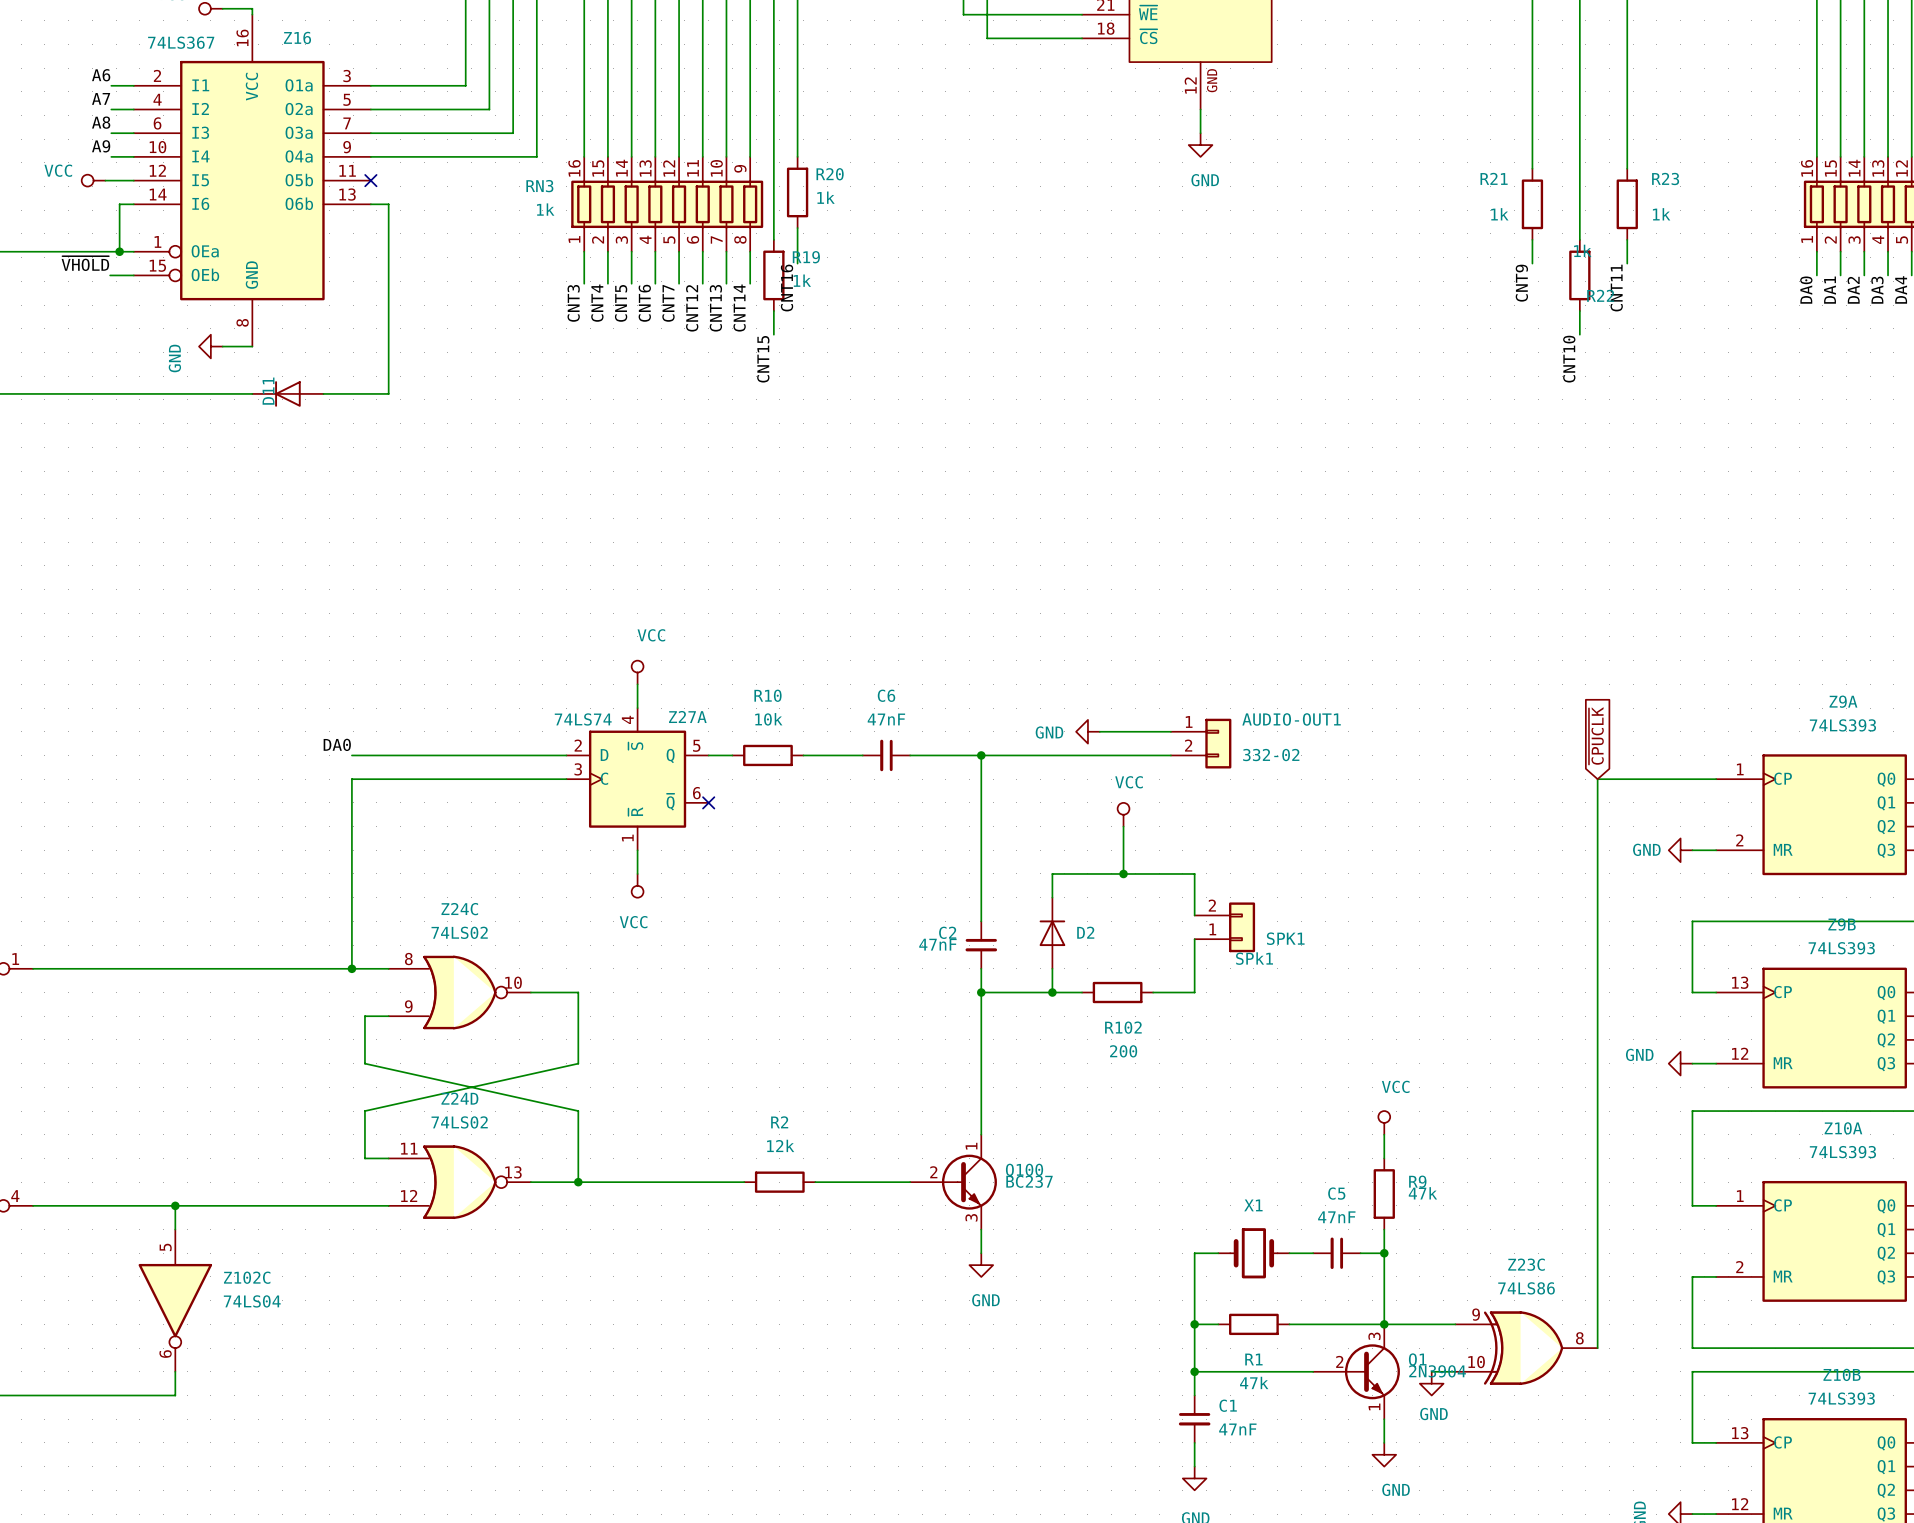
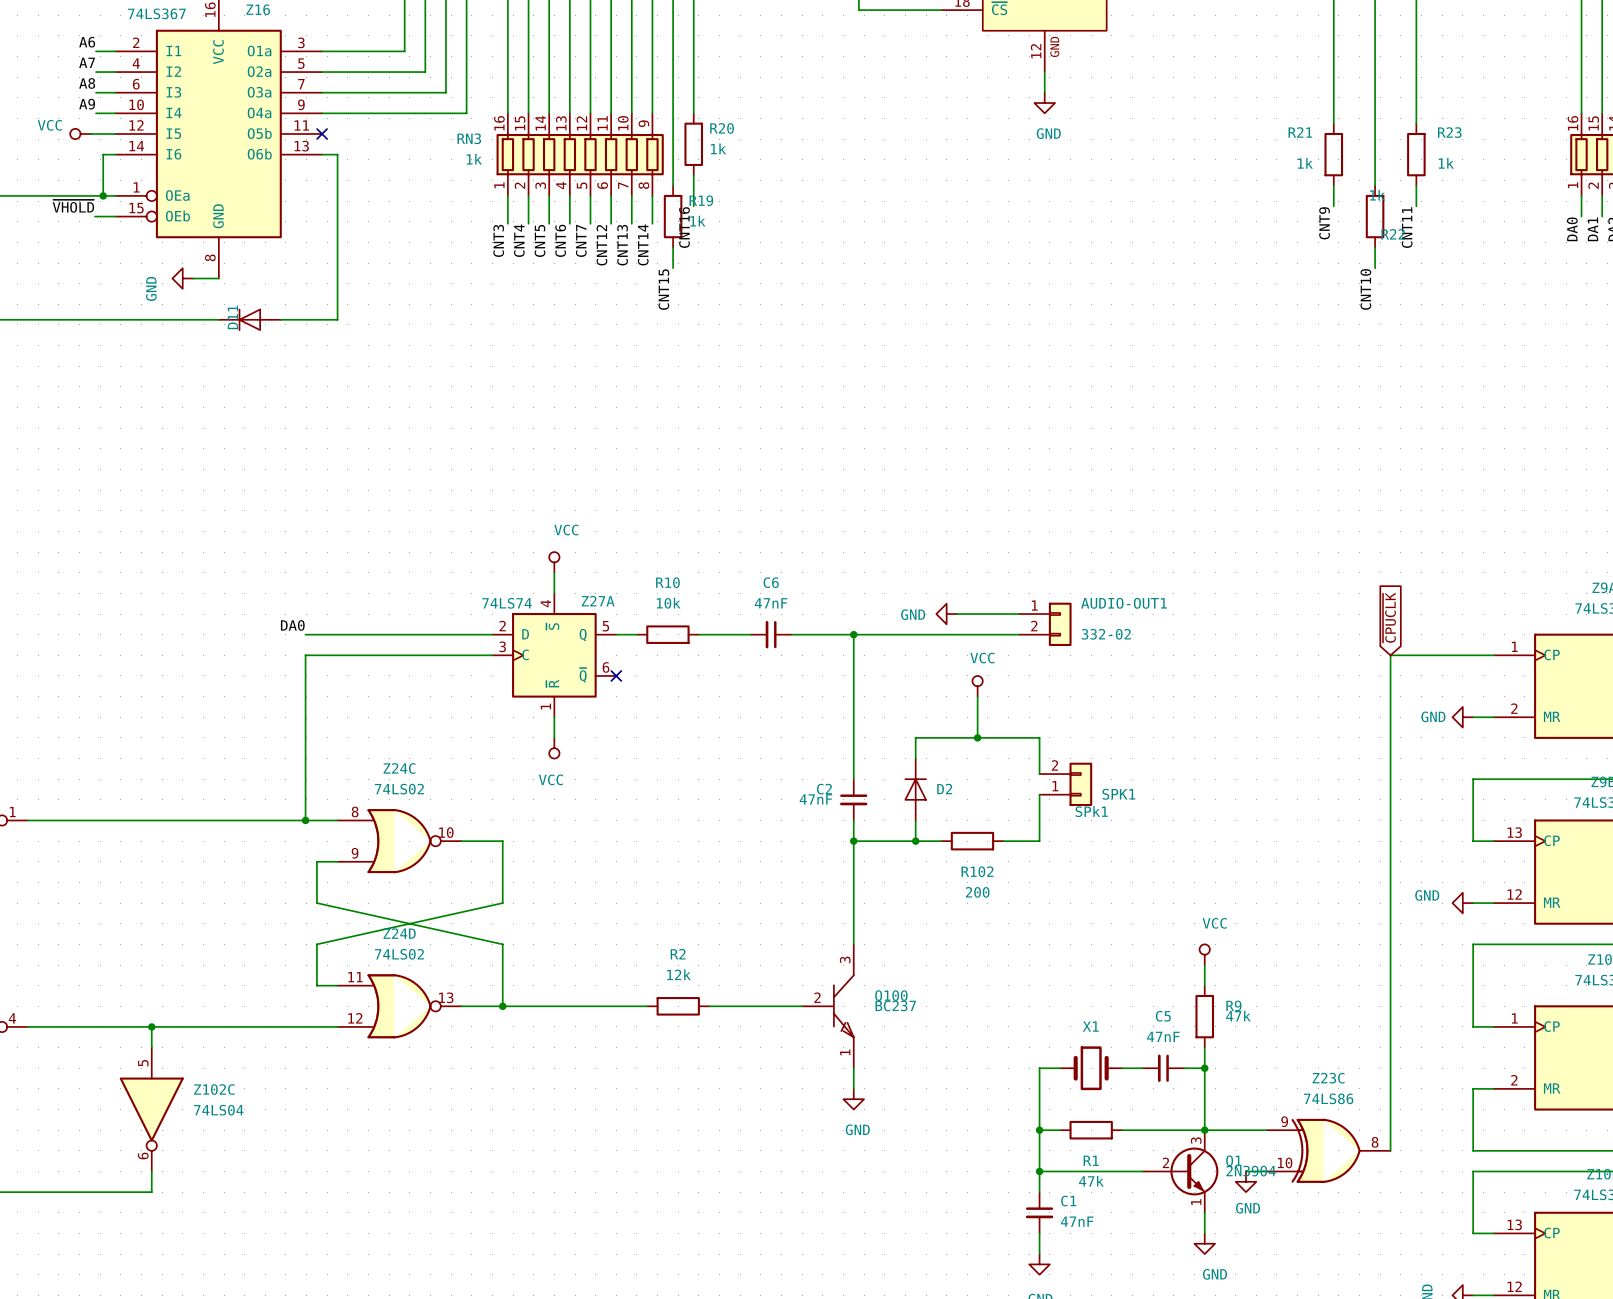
Q100 symbol: [910, 1134, 997, 1230] -> [802, 944, 855, 1069]
power symbol position: GND (981, 1265) -> GND (853, 1099)

